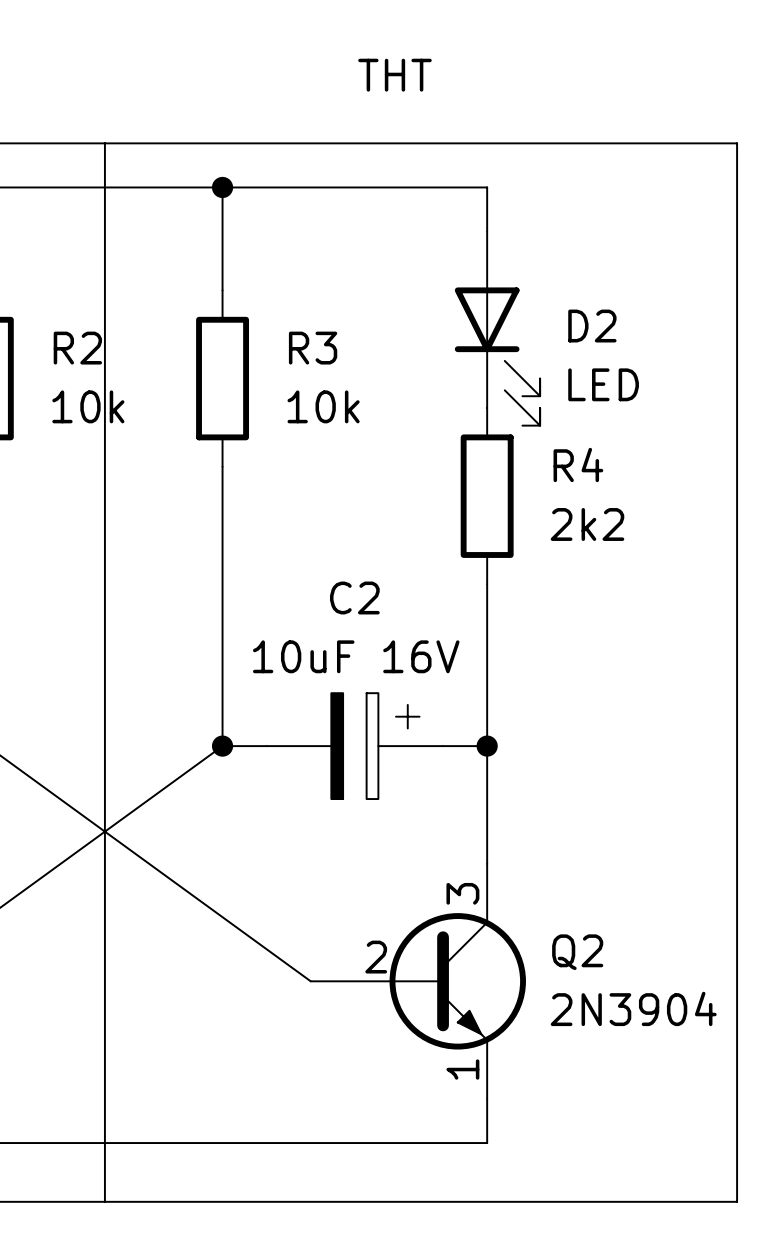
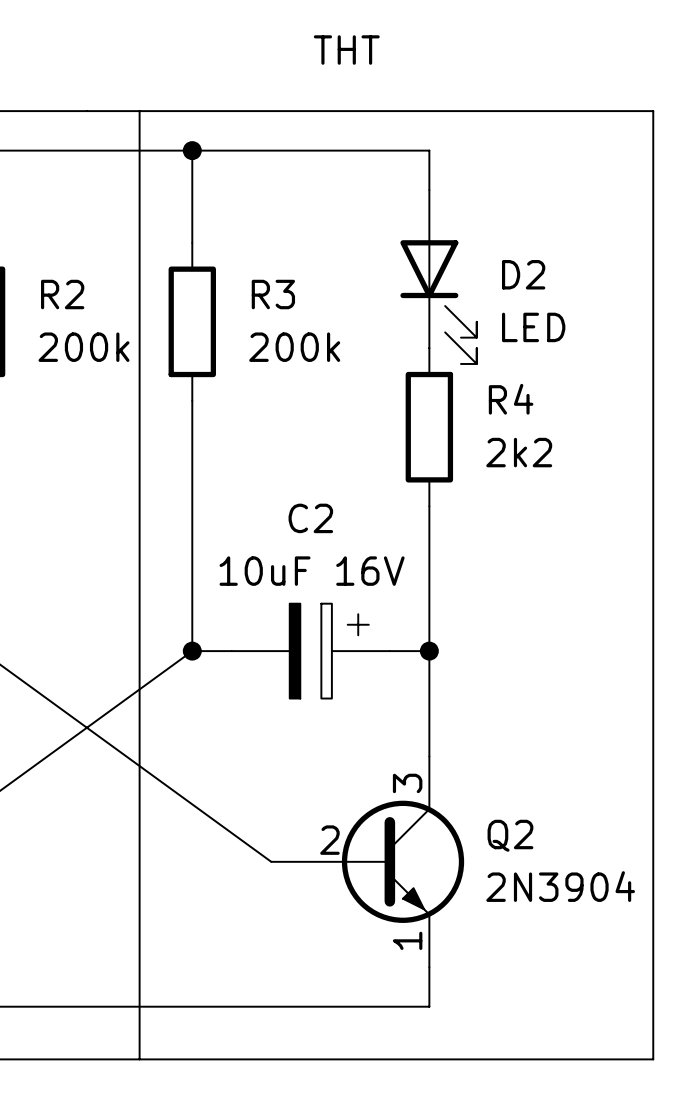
line: (104, 143) (104, 1201) -> (139, 111) (139, 1059)
R2 value: 10k (88, 406) -> 200k (83, 347)
R3 value: 10k (323, 406) -> 200k (294, 347)

